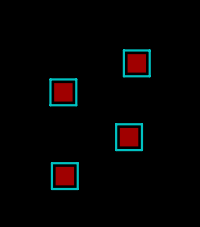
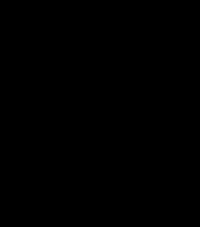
part: (136, 63) -> none
part: (63, 92) -> none
part: (129, 137) -> none
part: (64, 176) -> none

